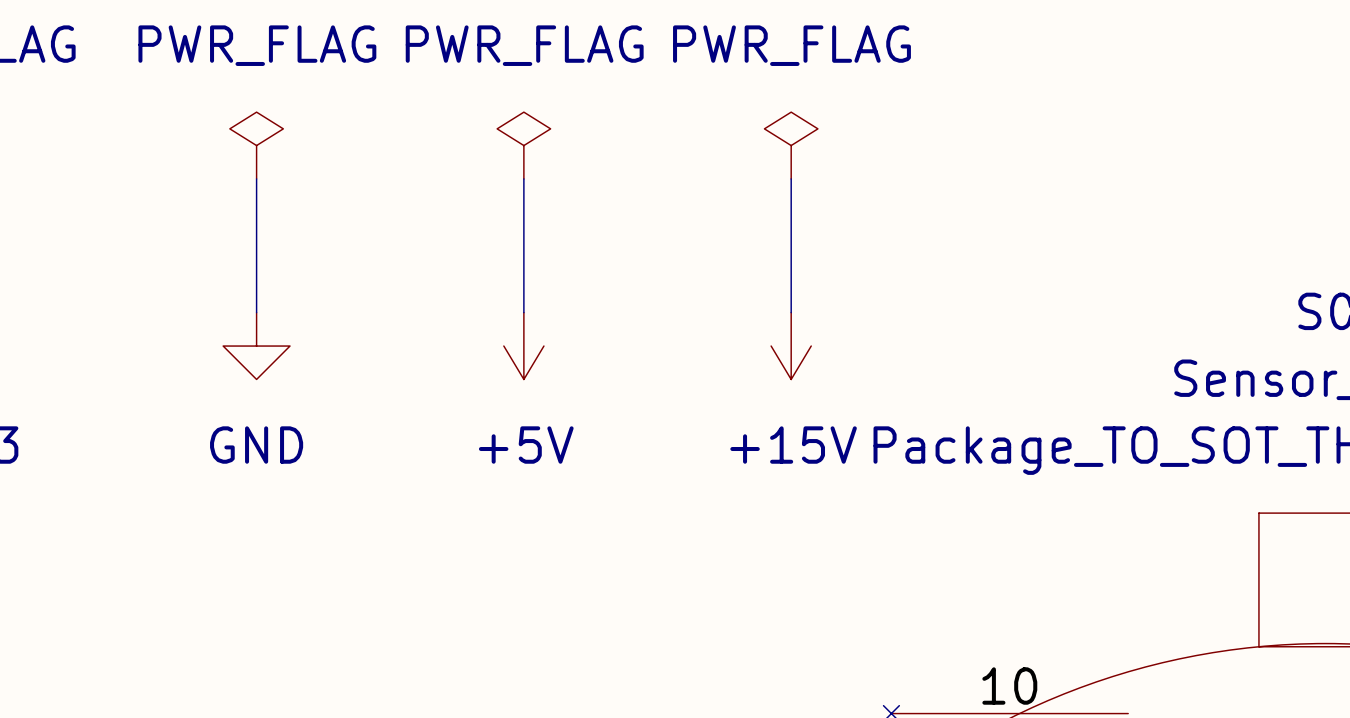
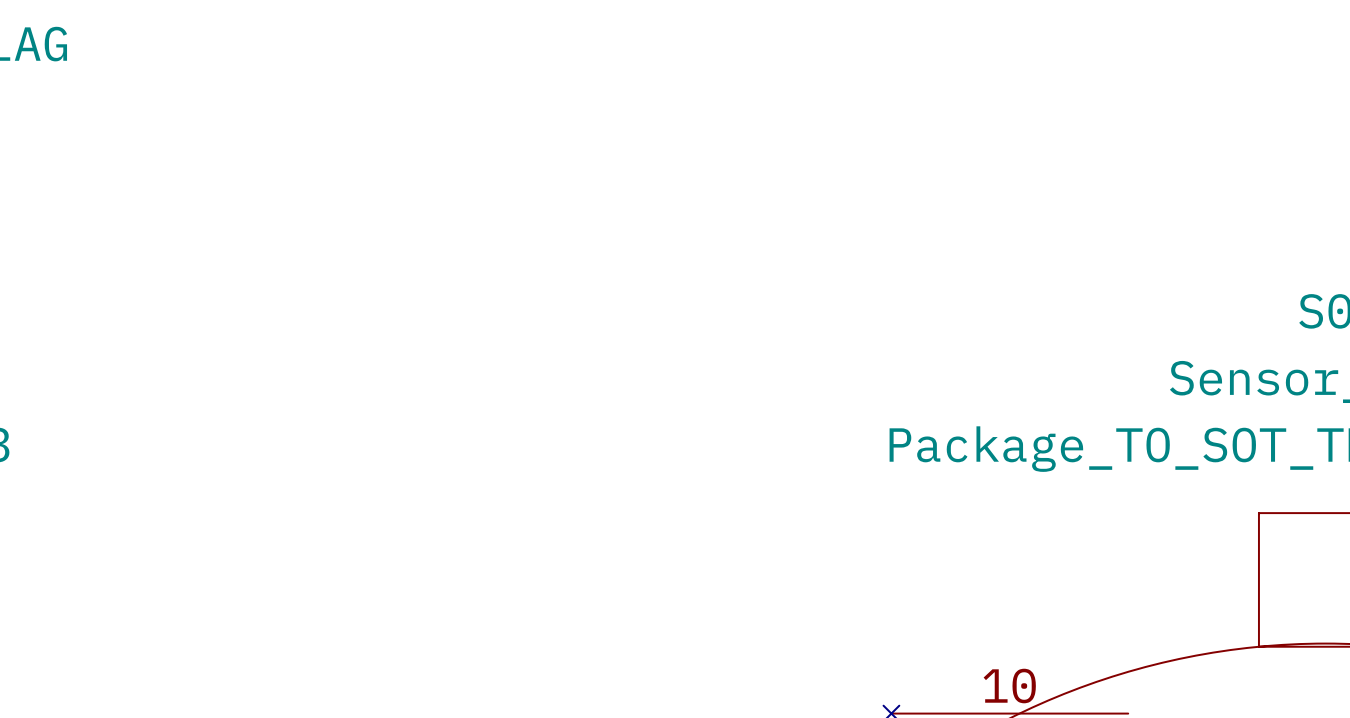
power symbol: PWR_FLAG (256, 145) -> none
power symbol: PWR_FLAG (523, 145) -> none
power symbol: PWR_FLAG (791, 145) -> none
wire: (256, 178) (256, 312) -> none
wire: (523, 178) (523, 312) -> none
wire: (791, 178) (791, 312) -> none
power symbol: GND (256, 346) -> none
power symbol: +5V (523, 346) -> none
power symbol: +15V (791, 346) -> none

